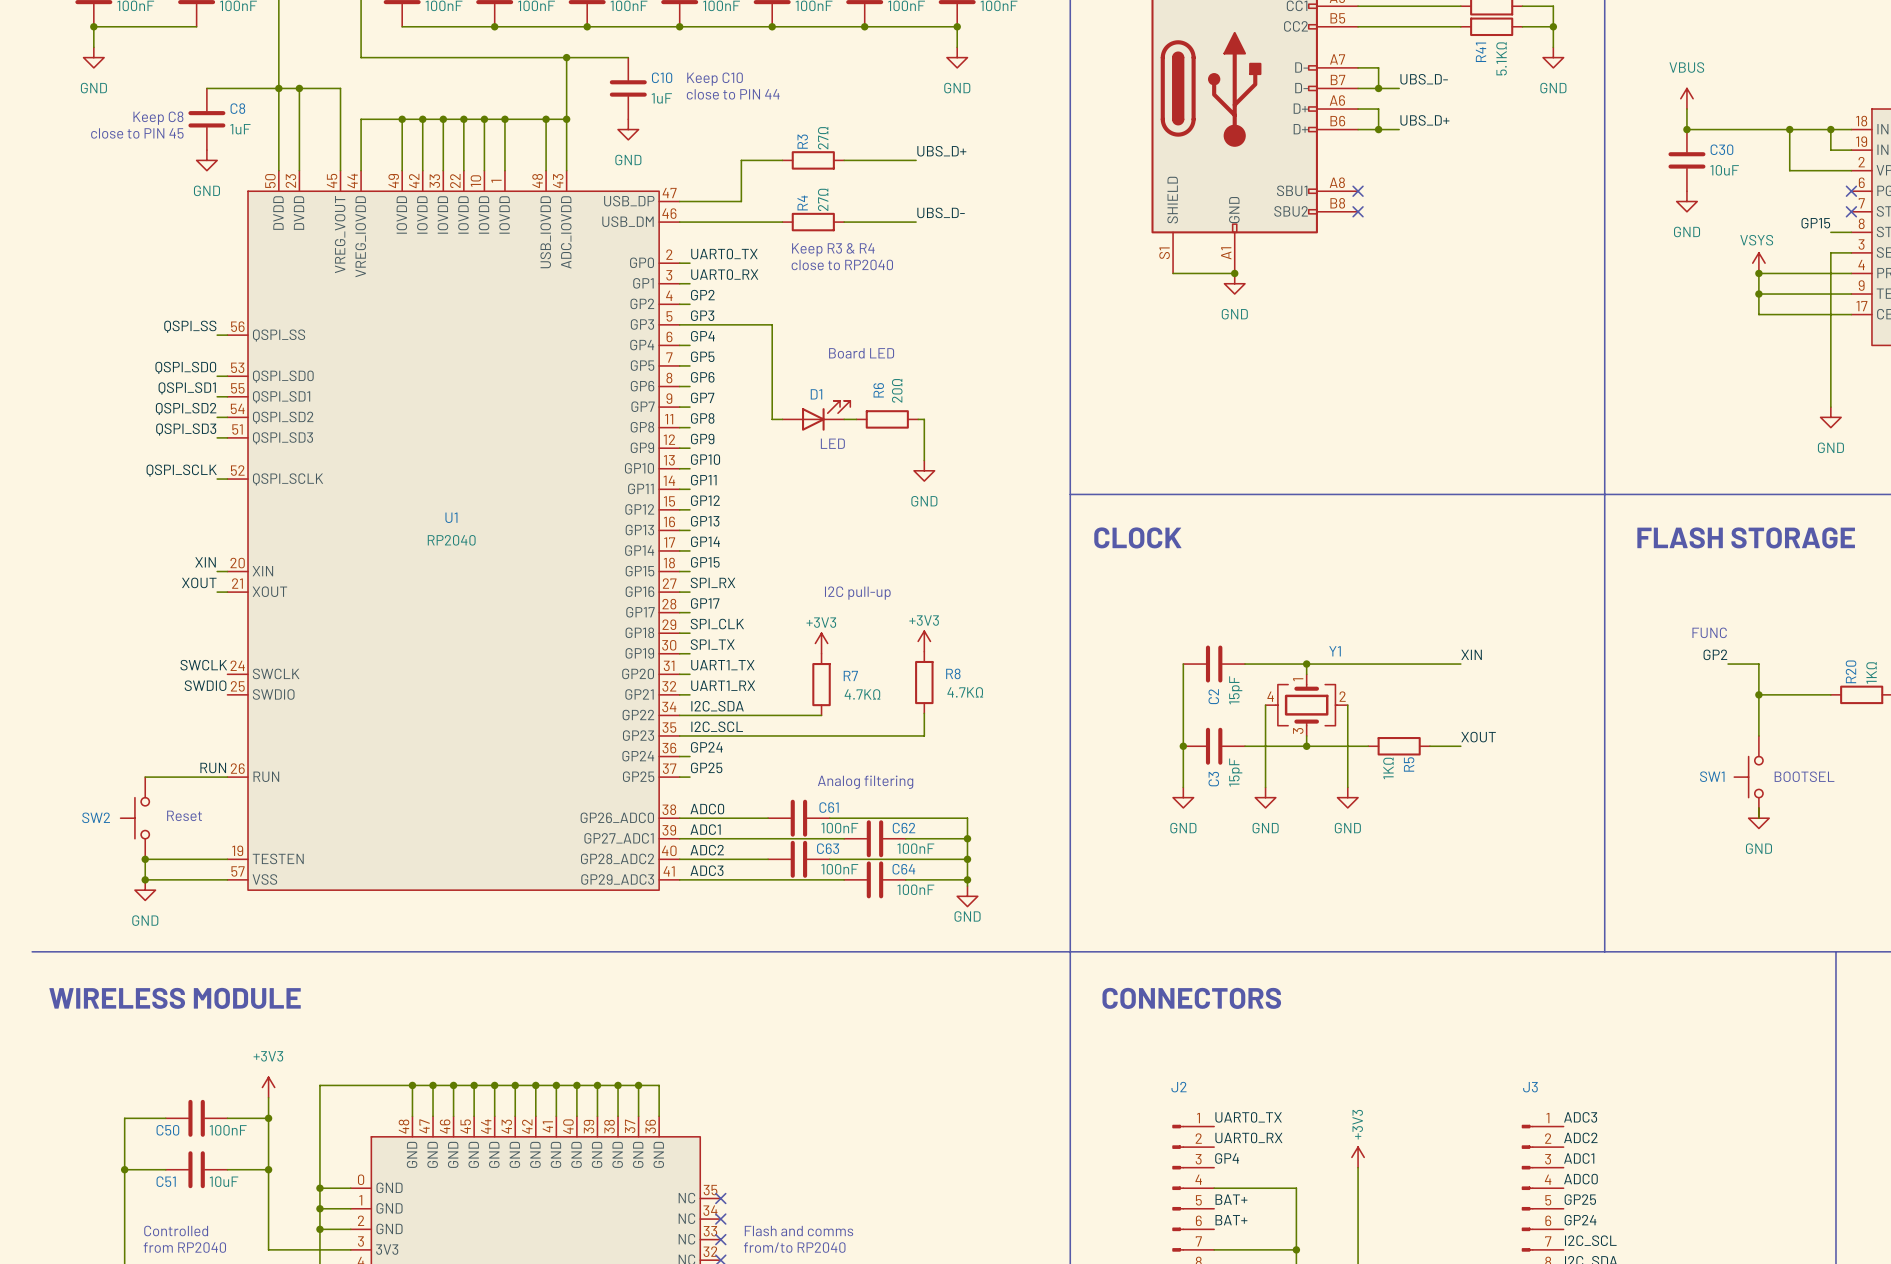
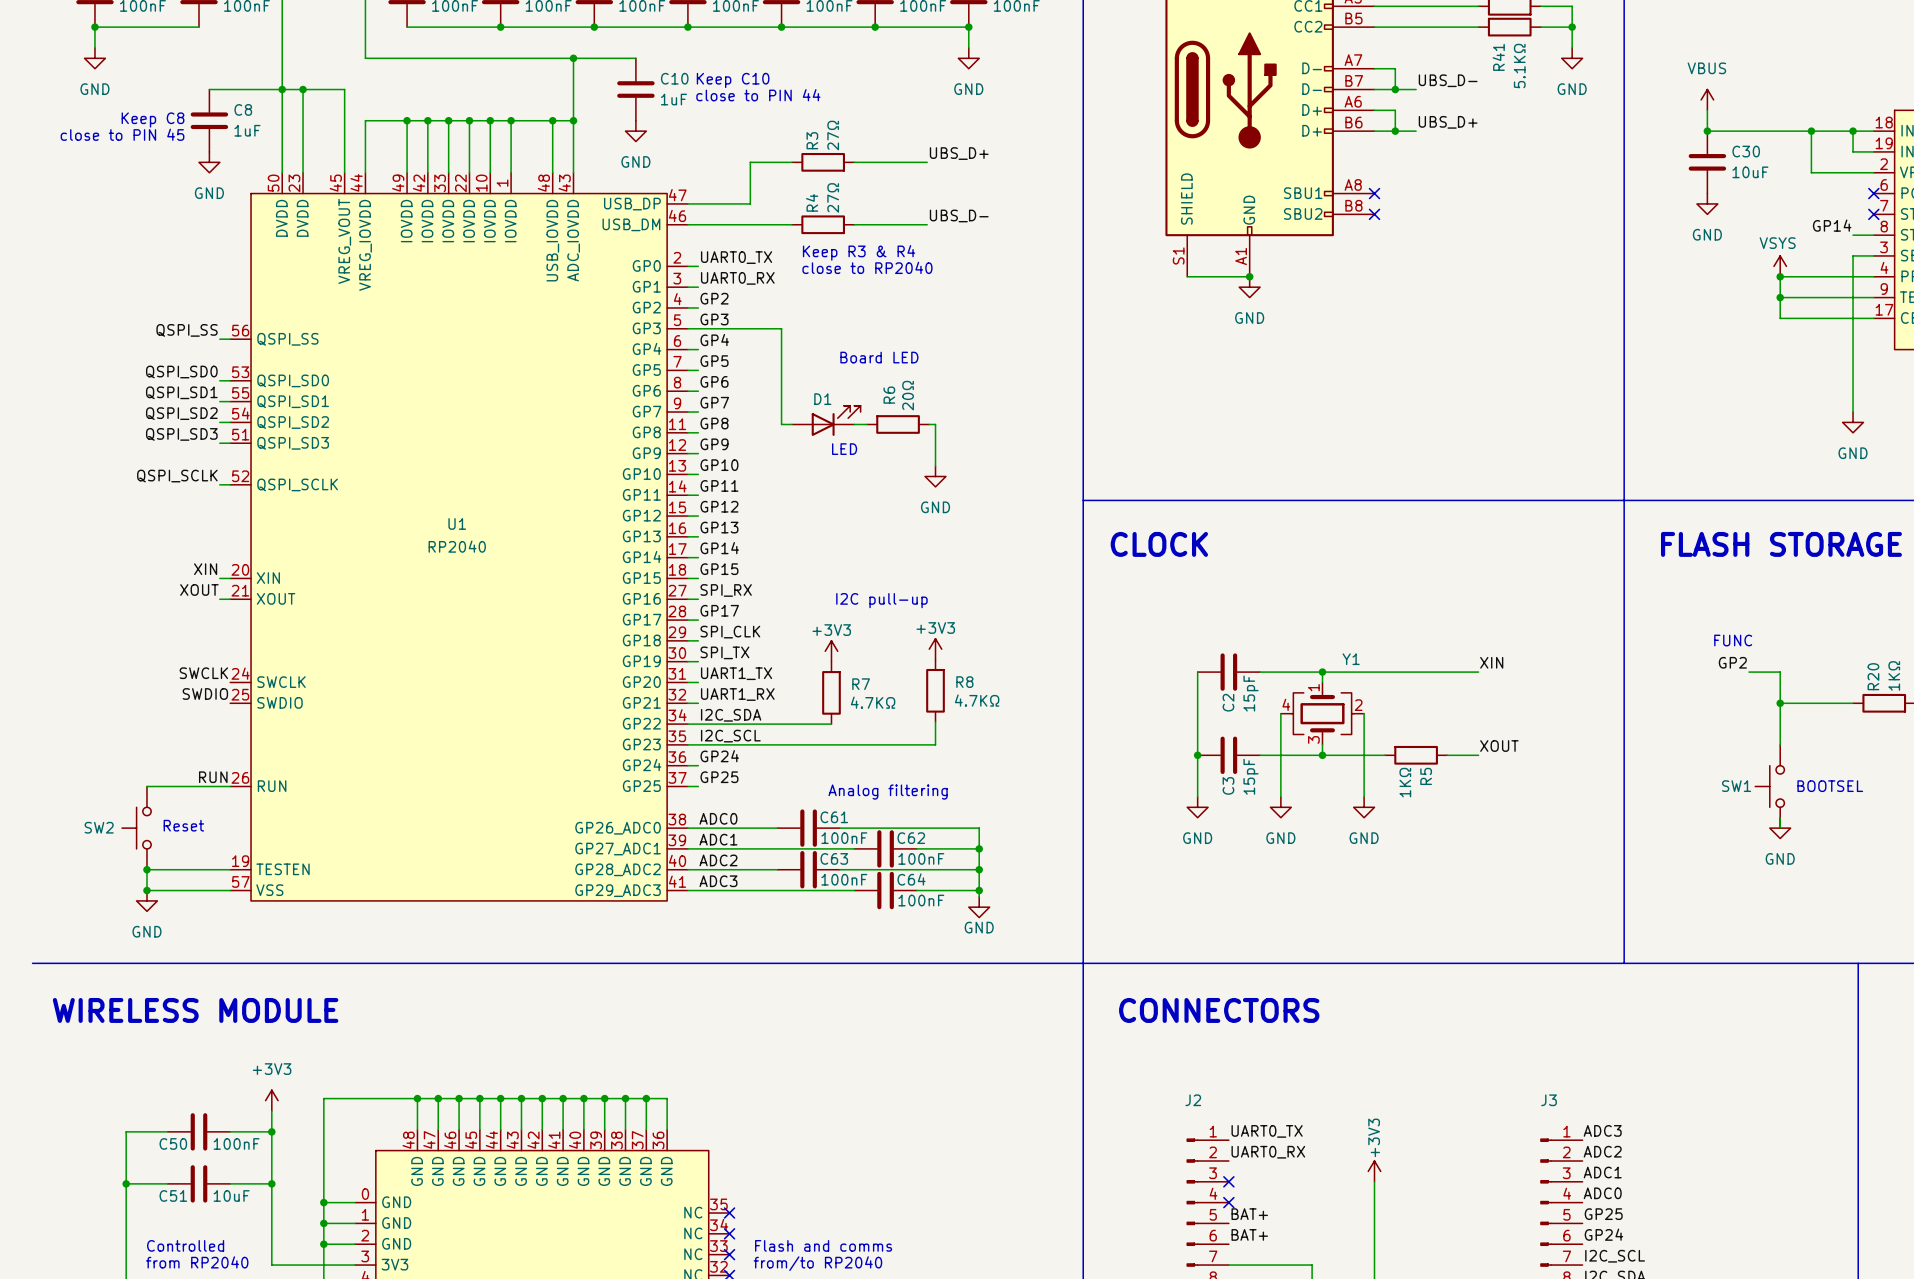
label: GP15 (1815, 223) -> GP14 (1832, 225)
label: GP4 (1227, 1158) -> none
no-connect mark: none -> (1228, 1181)
wire: (1214, 1188) (1296, 1188) (1296, 1249) -> none
no-connect mark: none -> (1228, 1202)
junction: (1296, 1249) -> none

